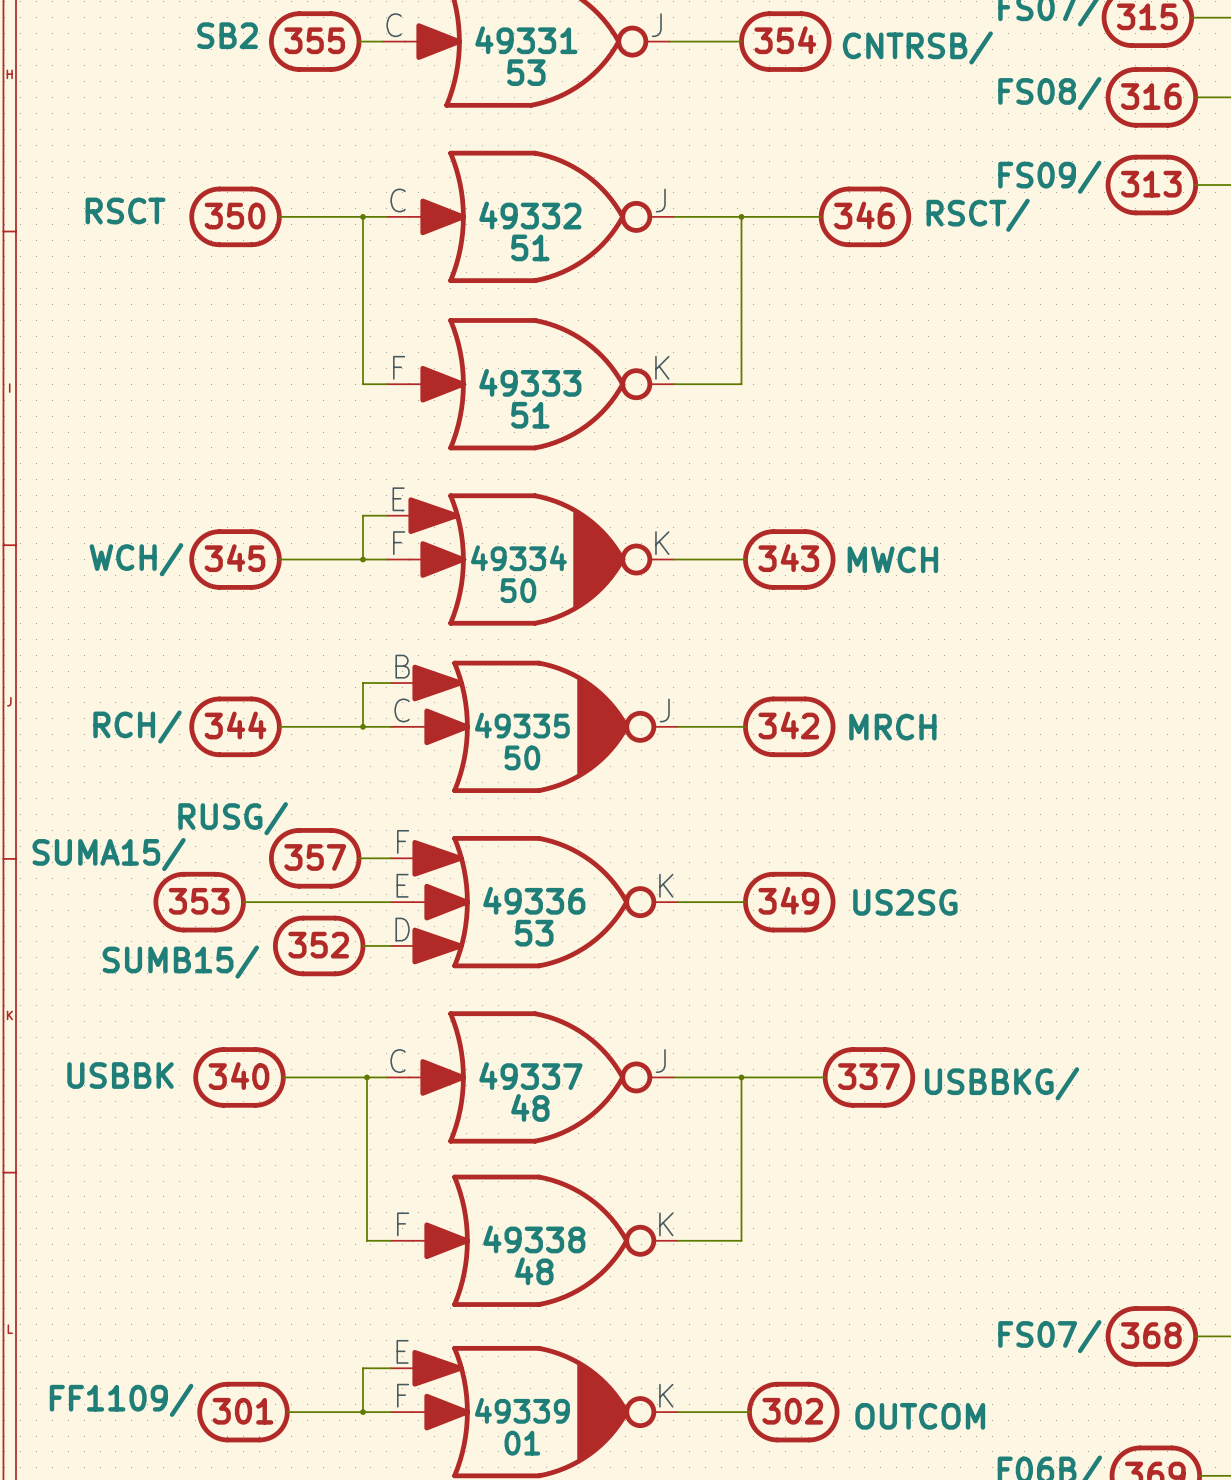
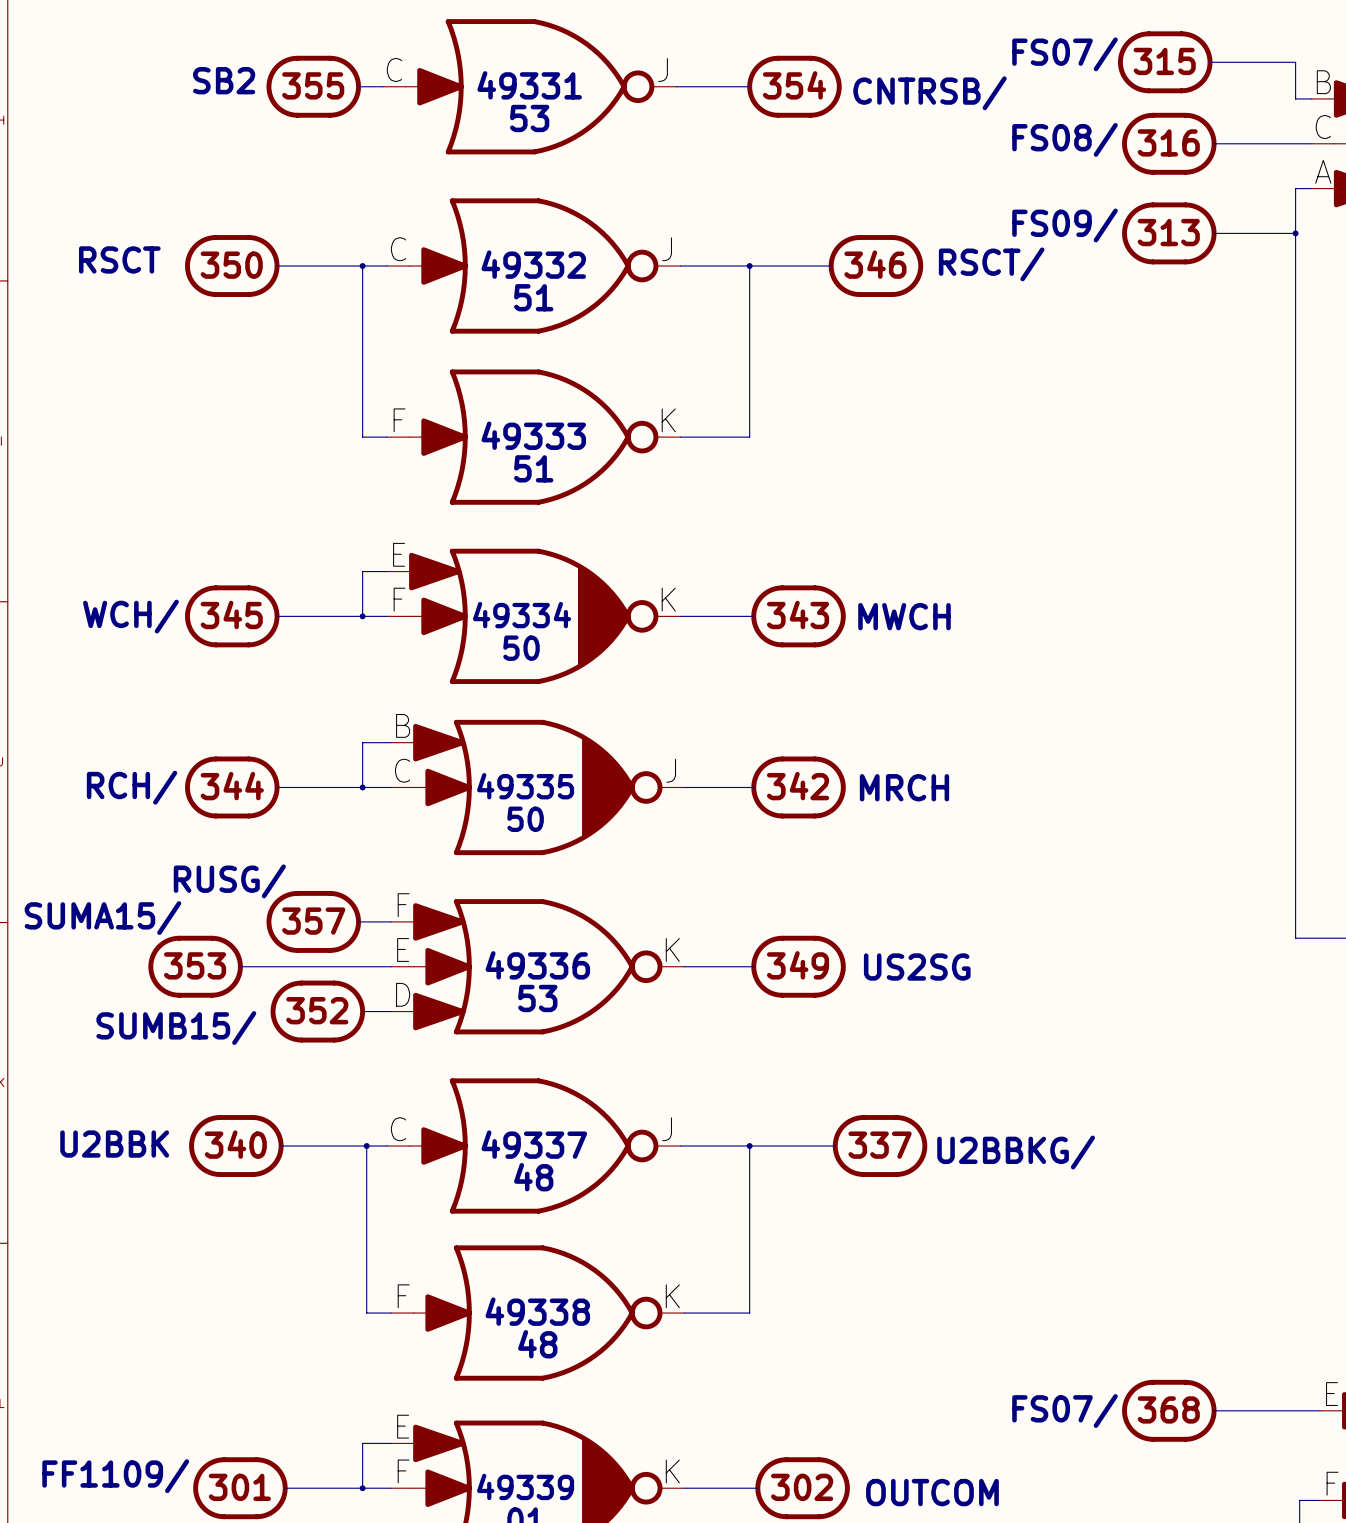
part text: USBBK (120, 1075) -> U2BBK (114, 1144)
part text: USBBKG/ (1002, 1083) -> U2BBKG/ (1016, 1152)

